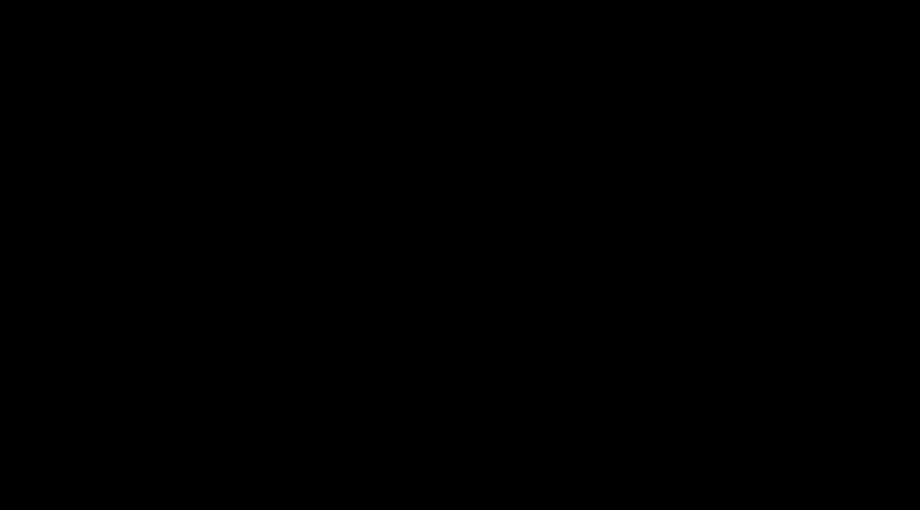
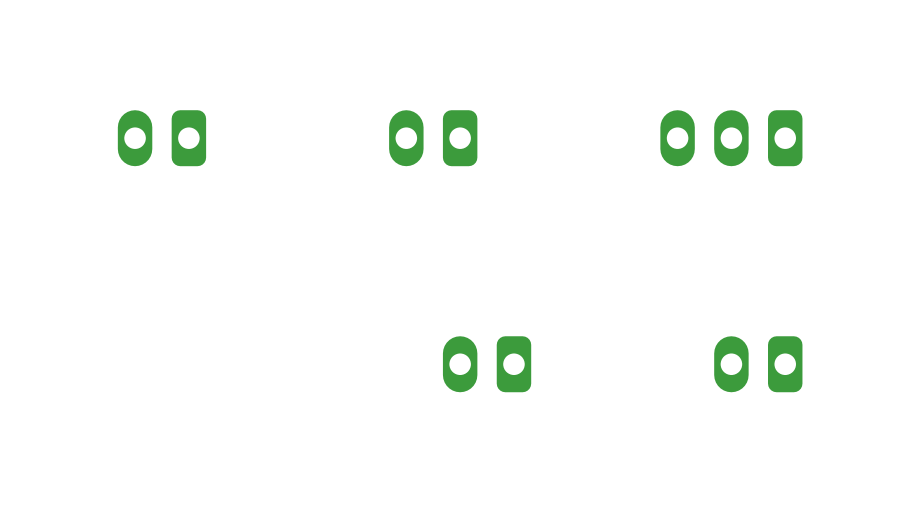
part: none -> (161, 138)
part: none -> (433, 138)
part: none -> (731, 138)
part: none -> (487, 364)
part: none -> (758, 364)

